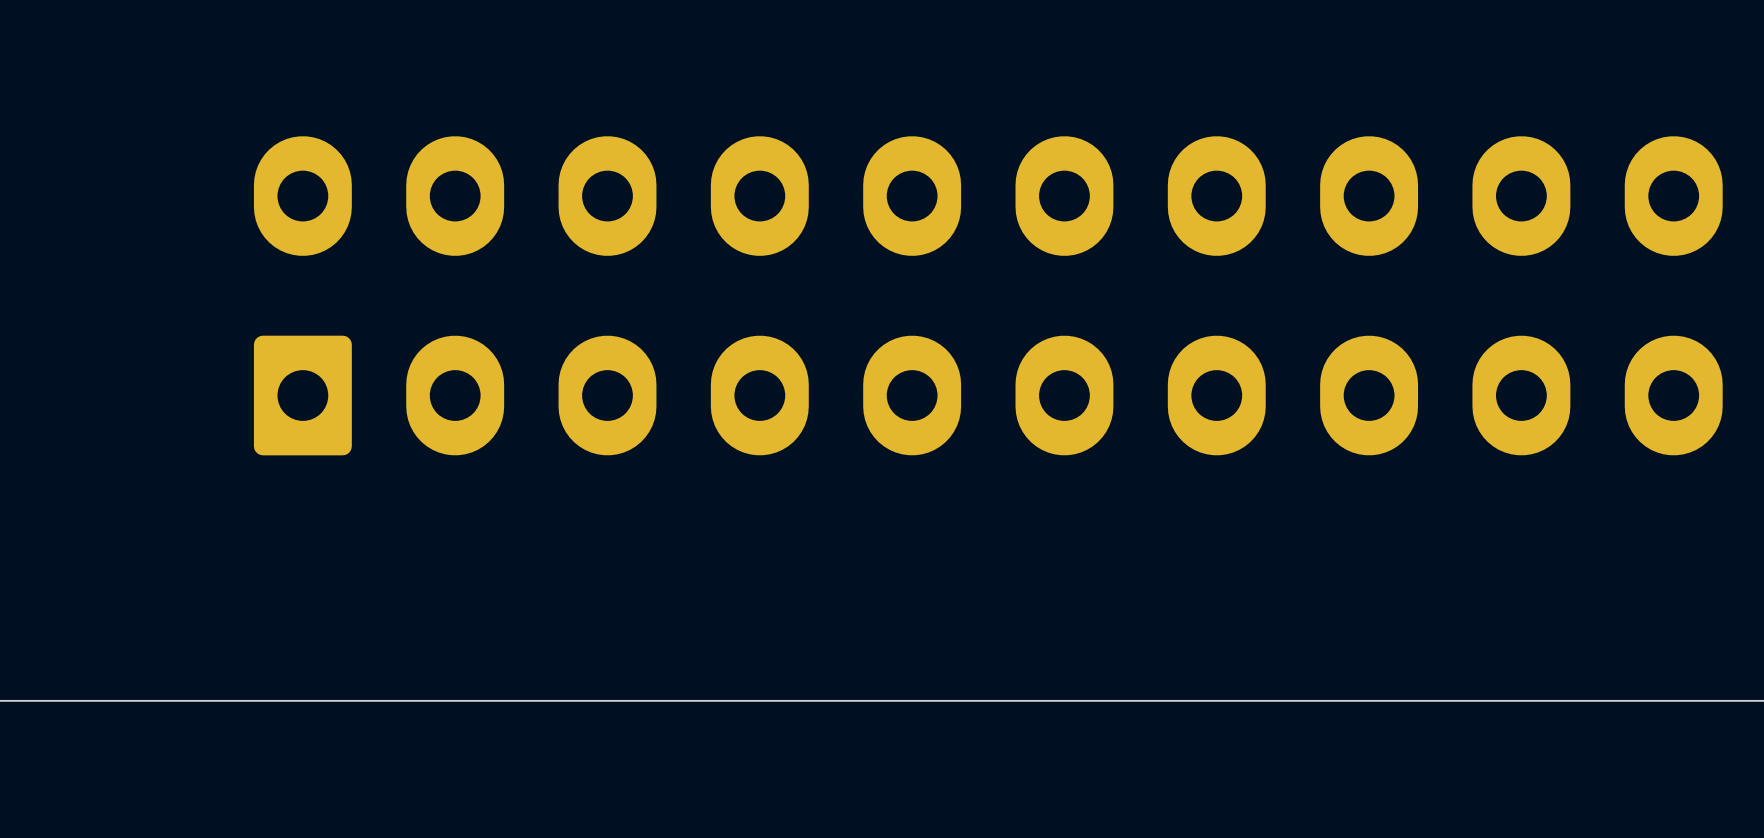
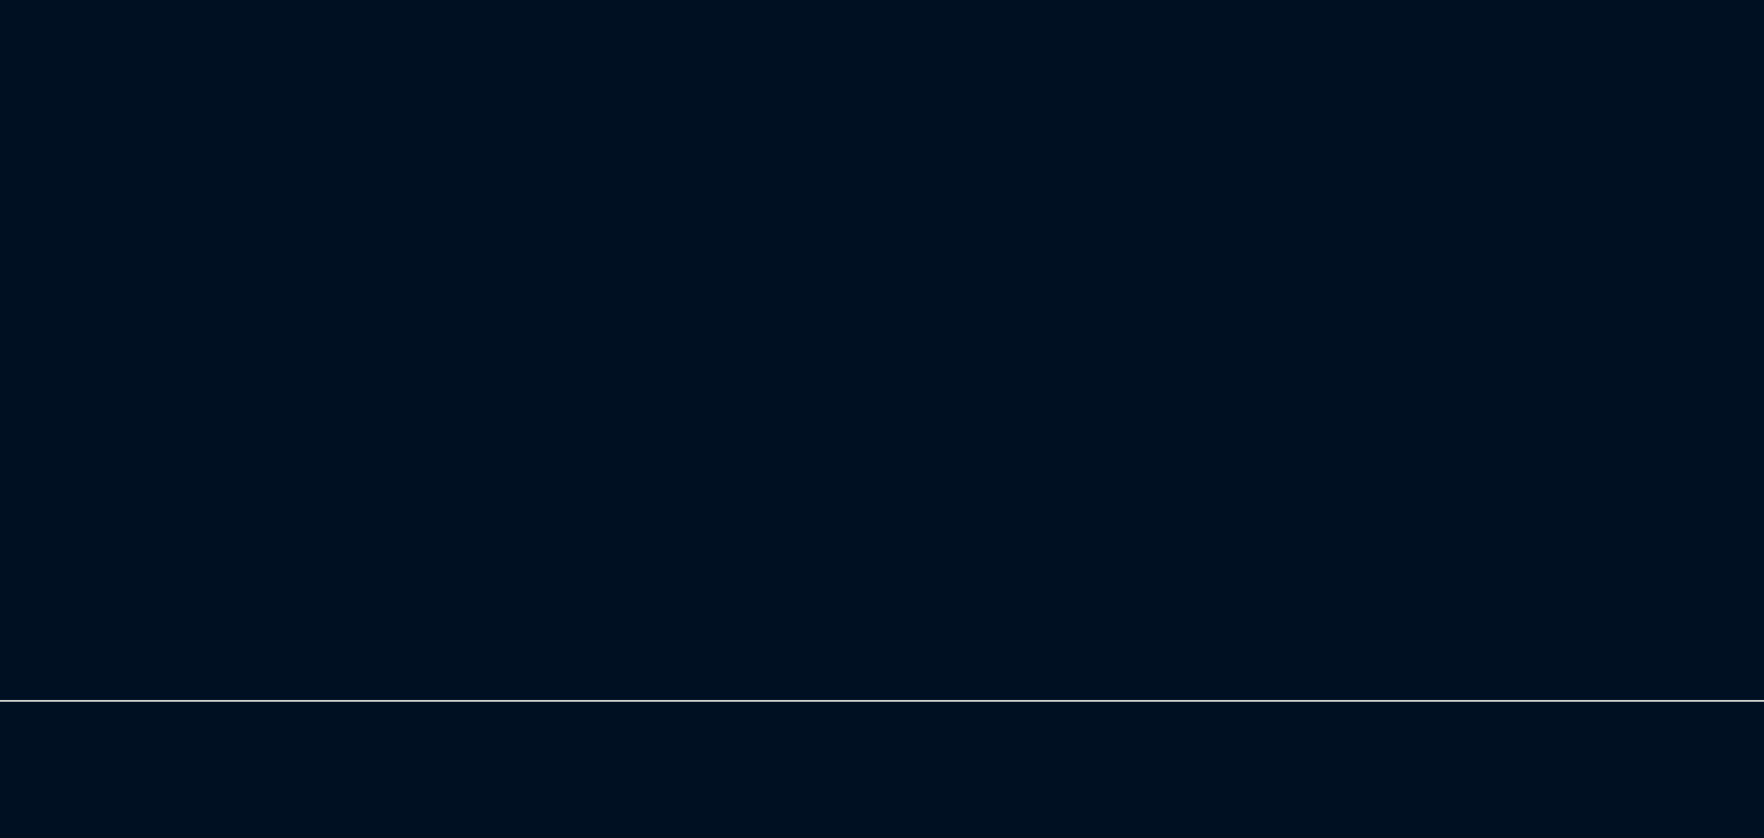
part: (988, 295) -> none

